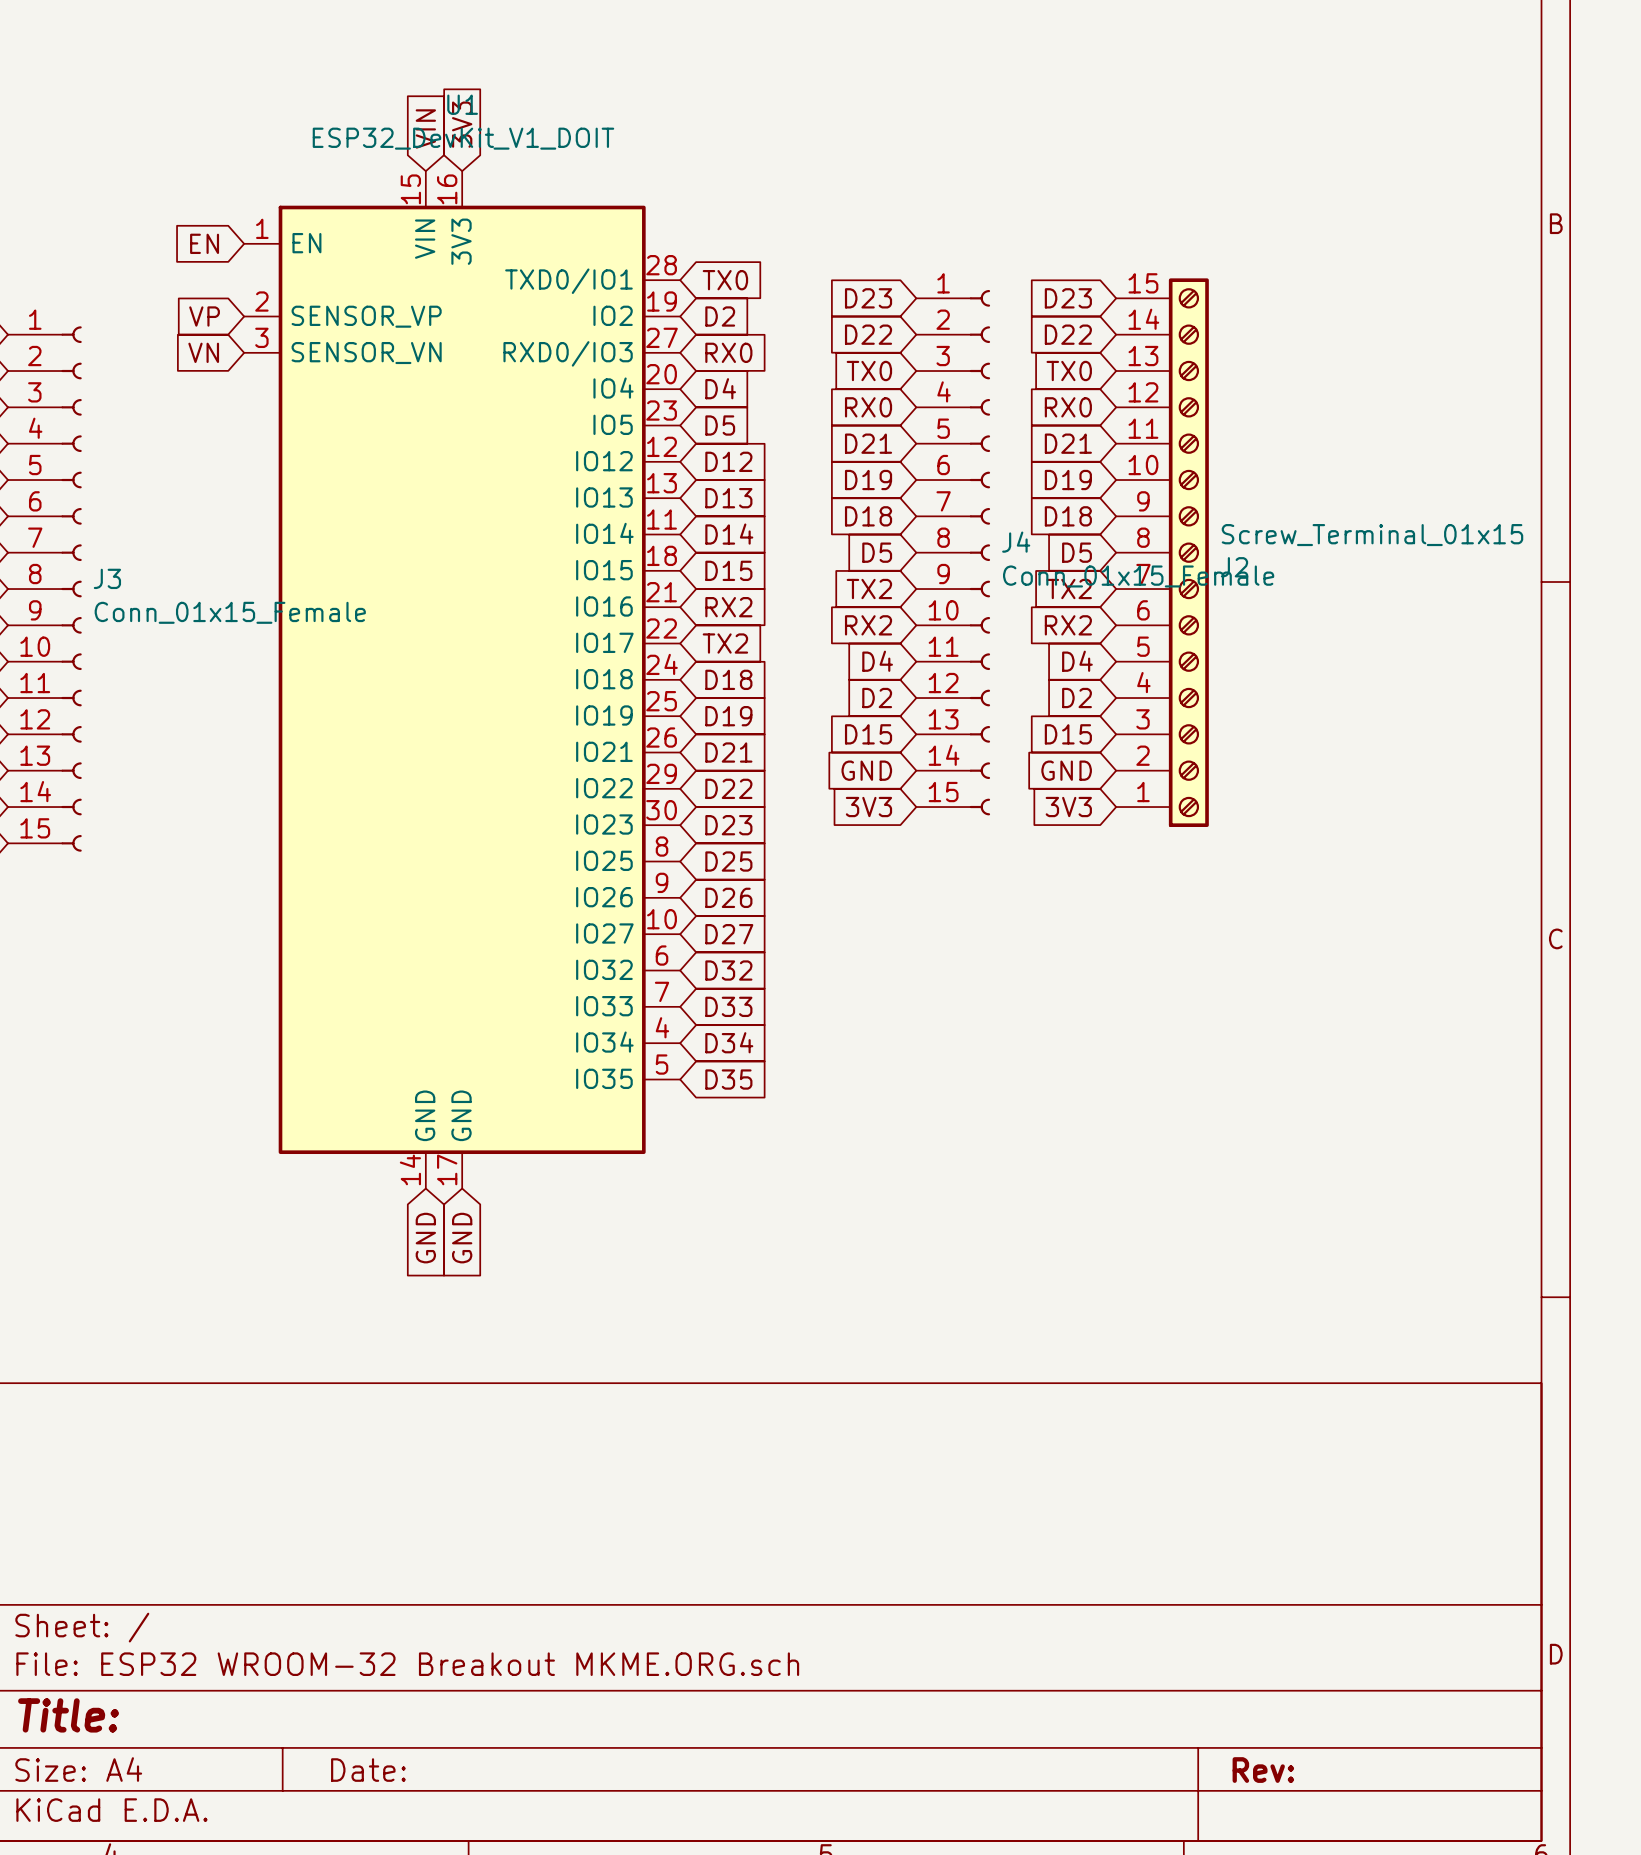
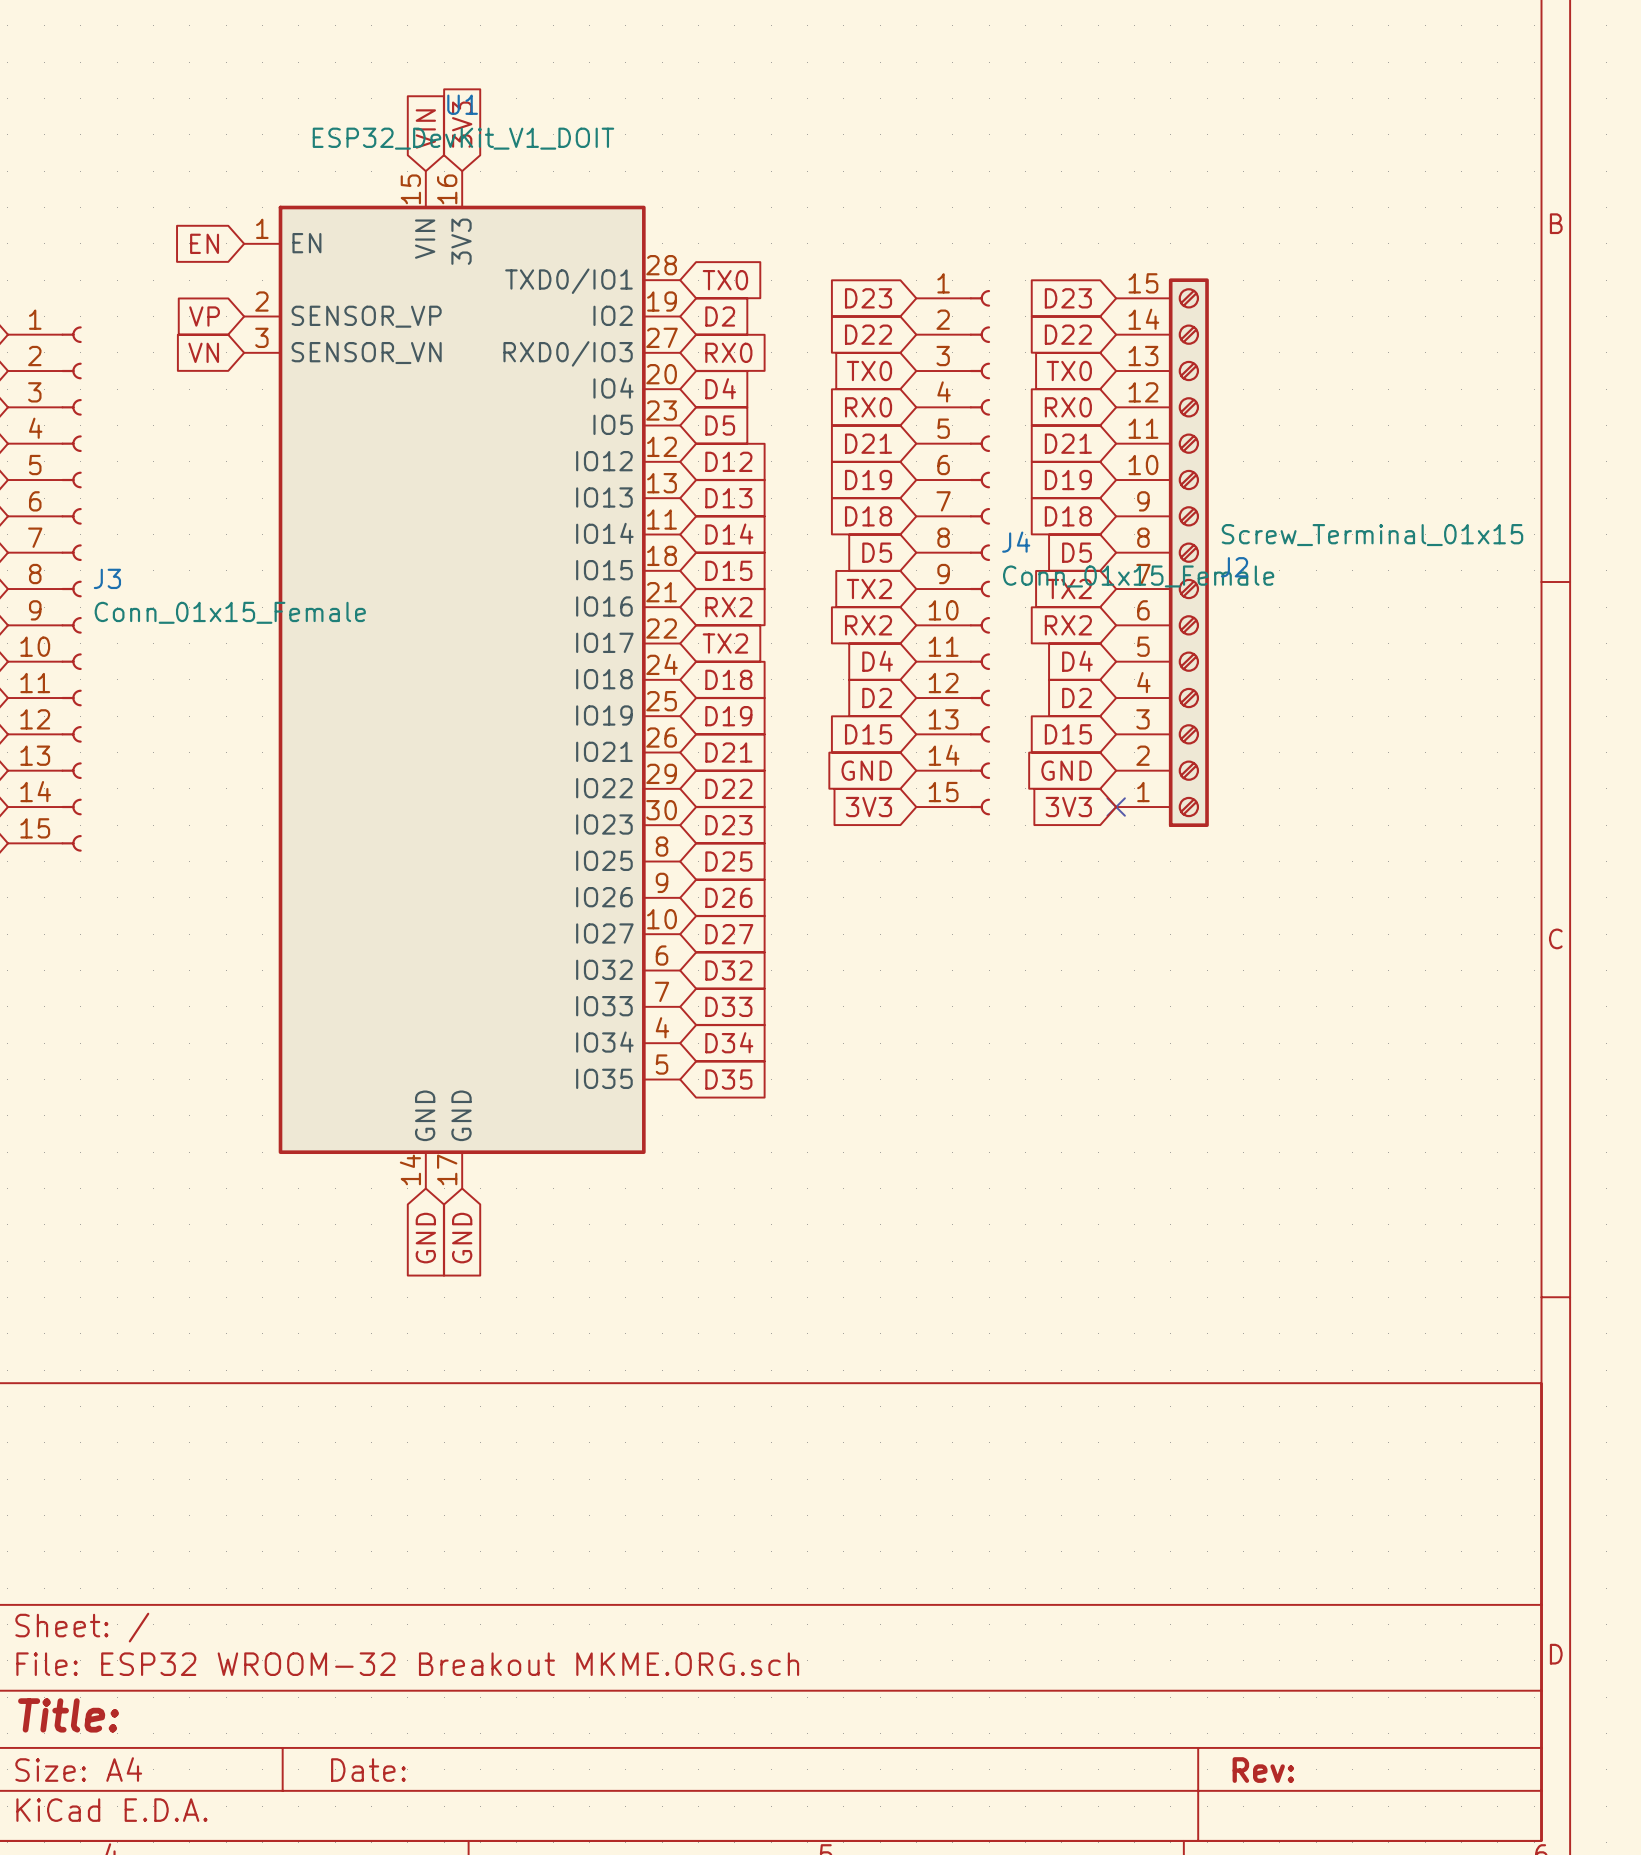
no-connect mark: none -> (1116, 807)

